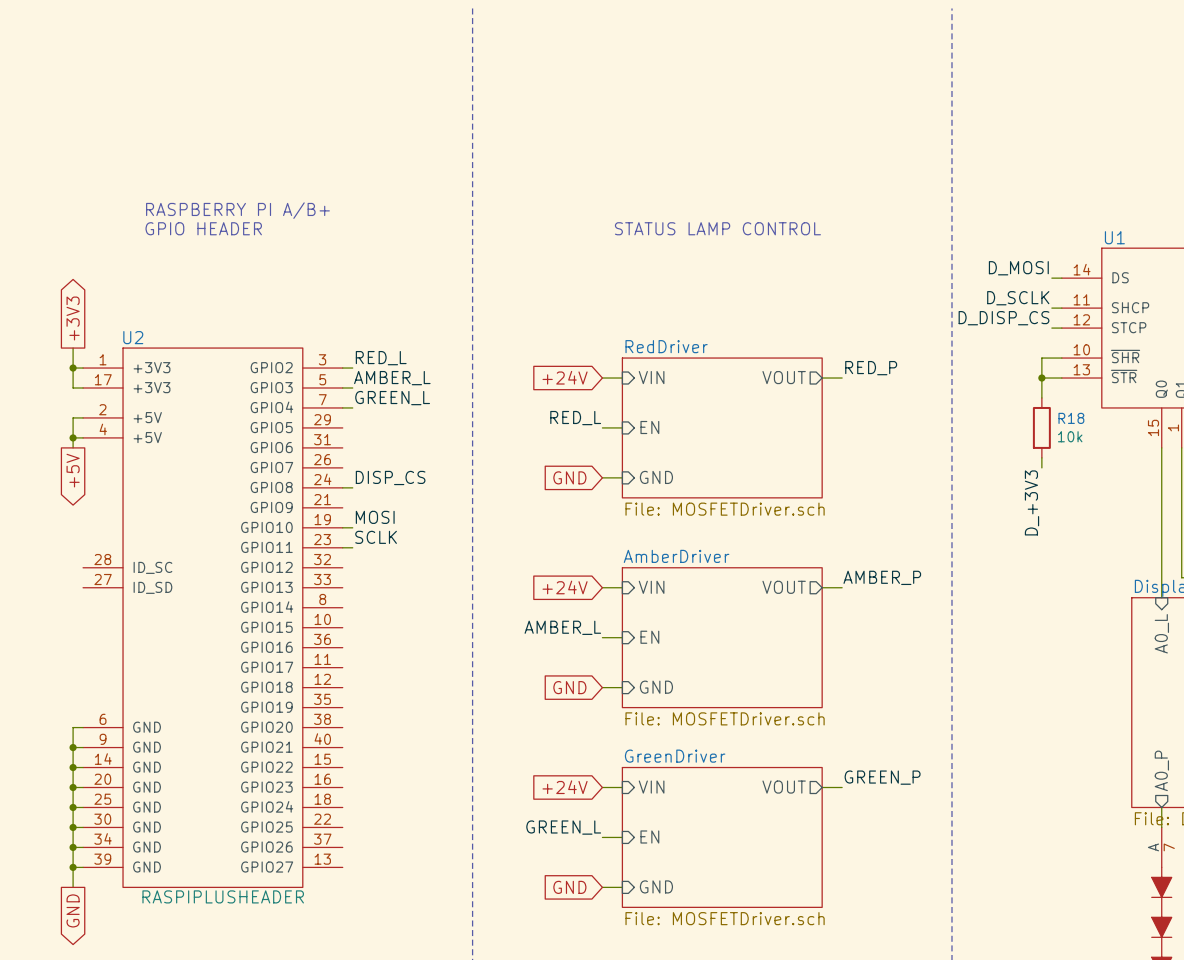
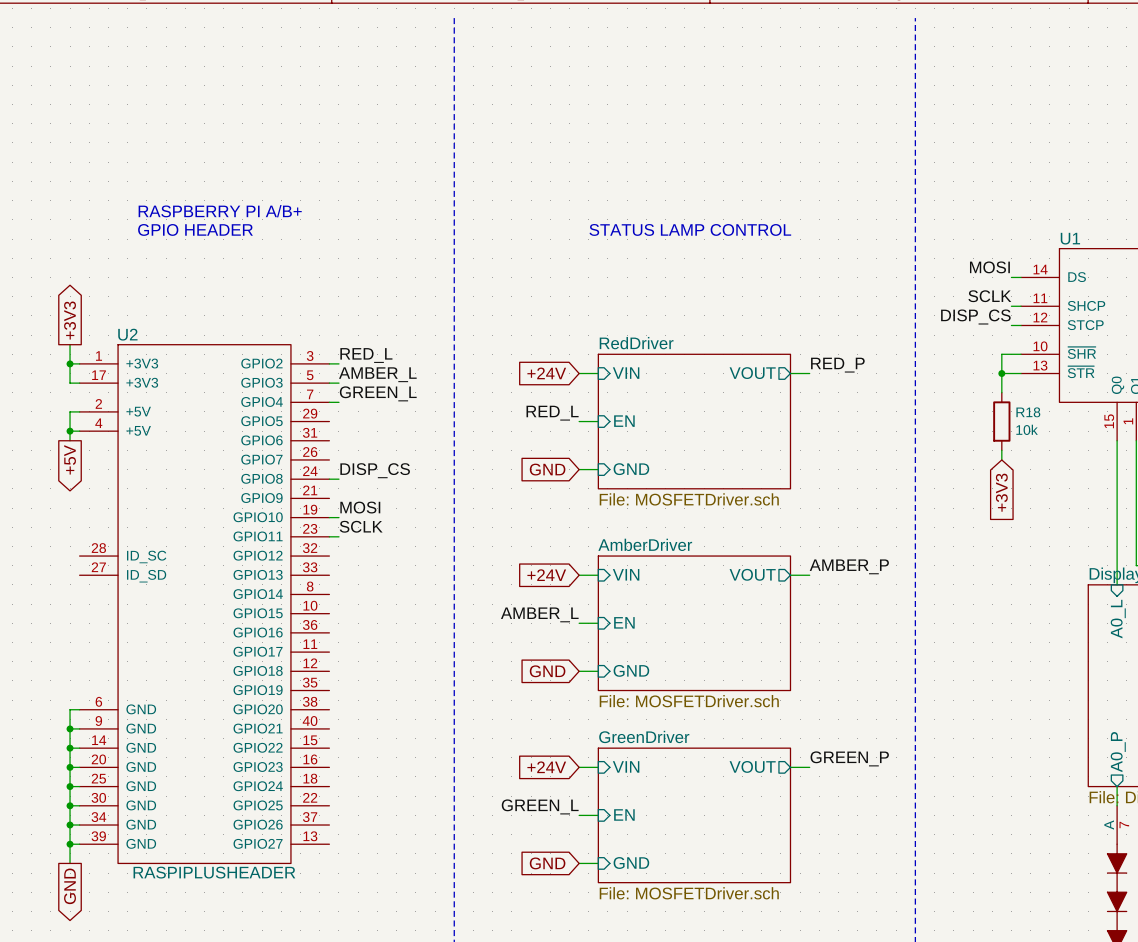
label: D_MOSI (1018, 268) -> MOSI (989, 267)
label: D_SCLK (1018, 298) -> SCLK (989, 296)
label: D_DISP_CS (1003, 318) -> DISP_CS (975, 317)
label: D_+3V3 (1031, 502) -> none
global label: none -> +3V3 (1001, 492)

